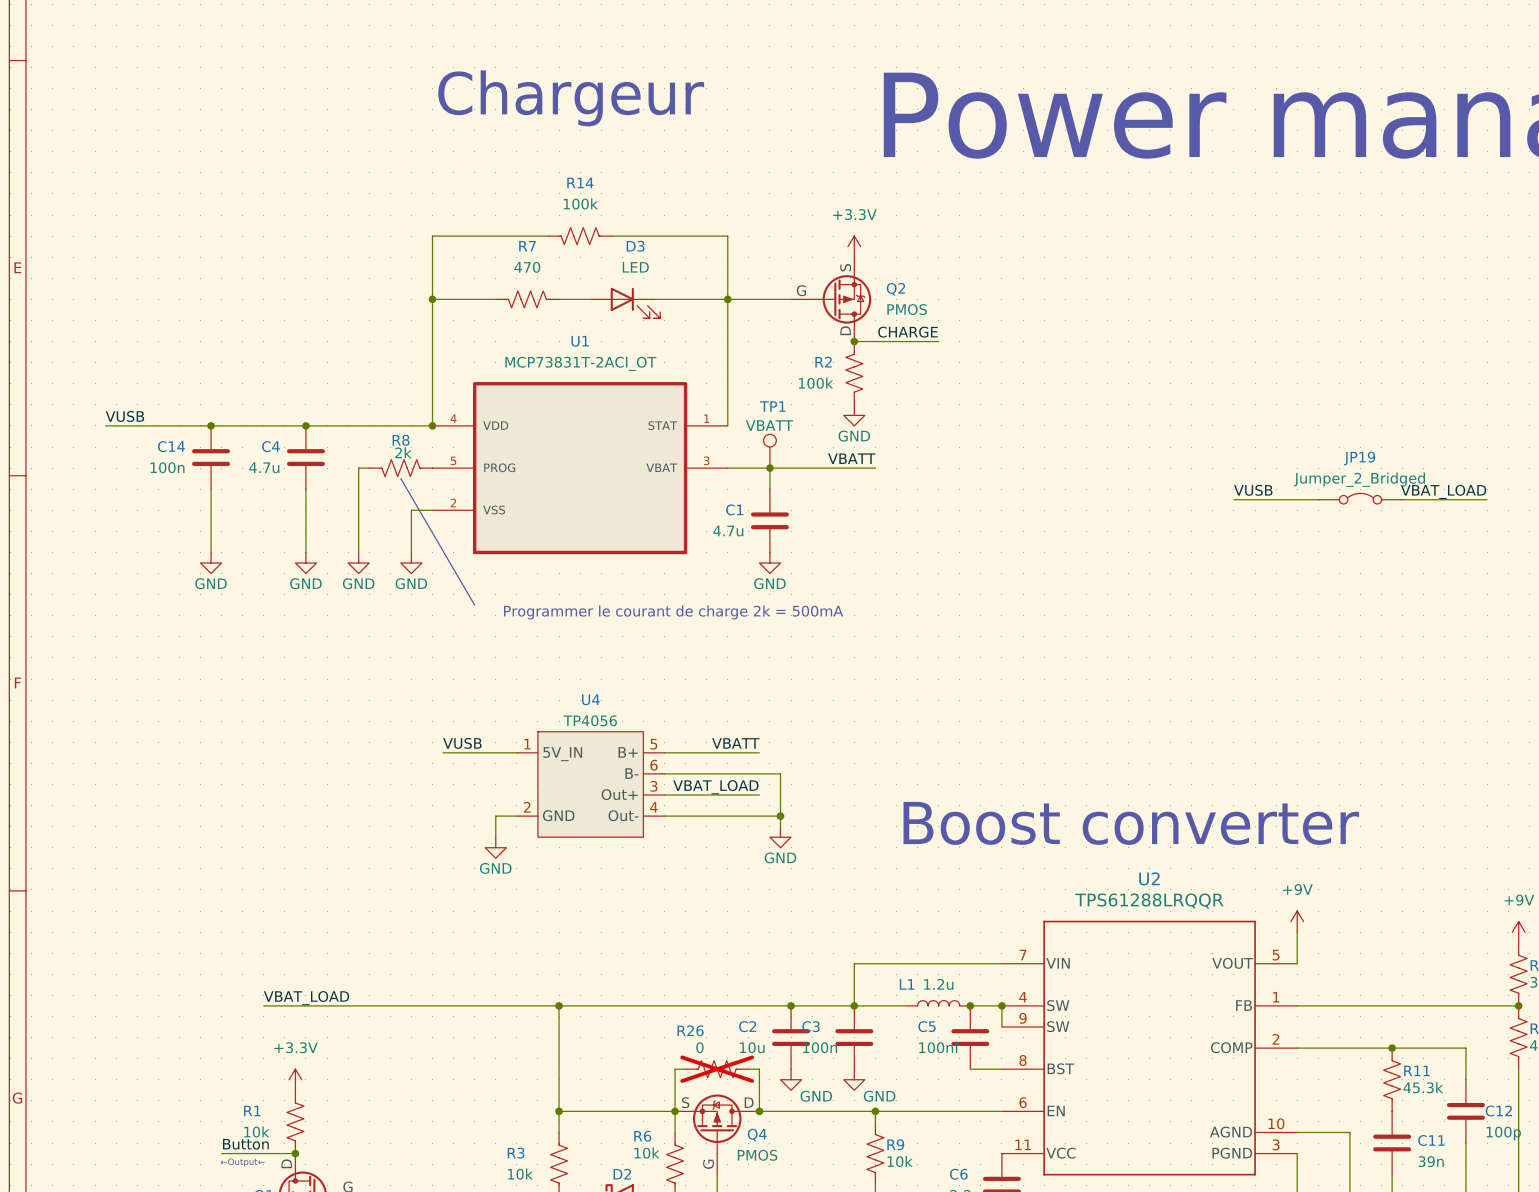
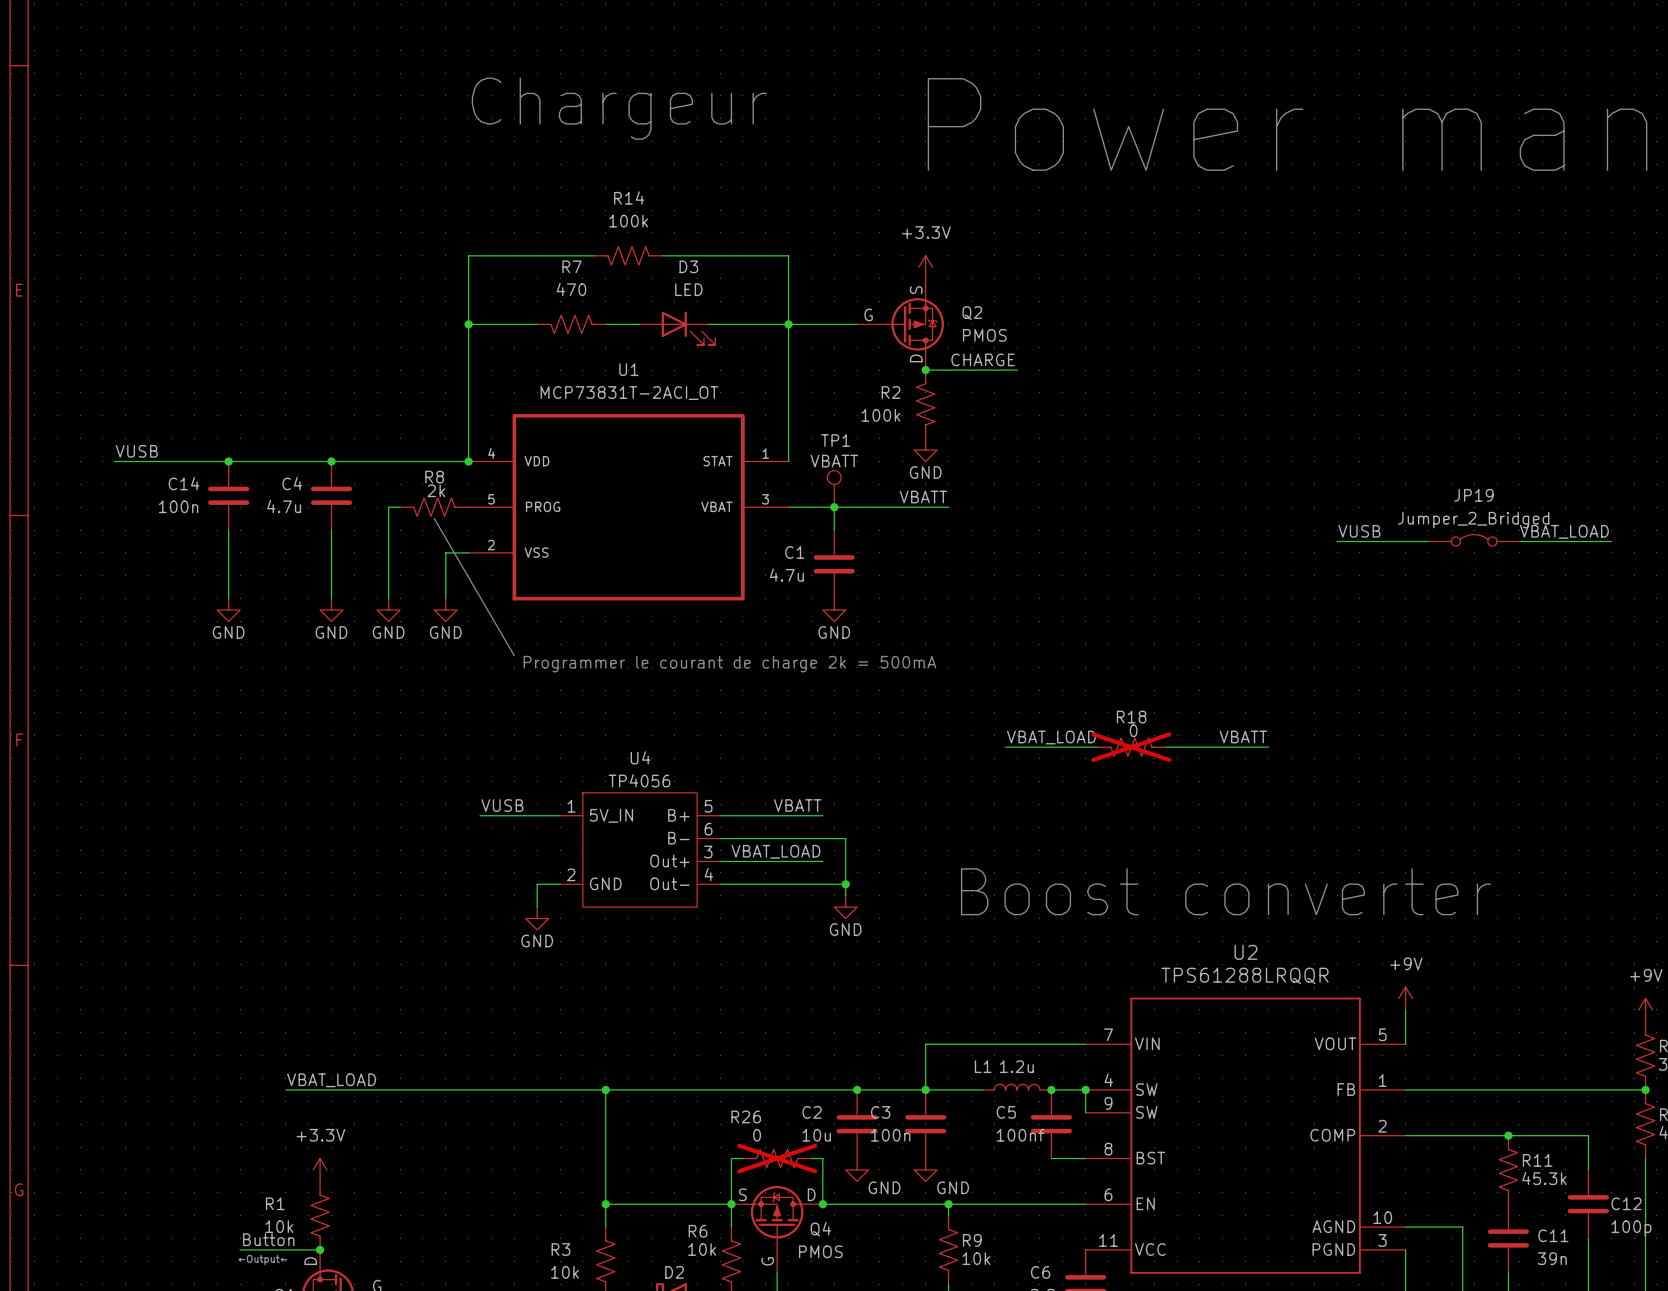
label: none -> VBATT (1243, 736)
label: none -> VBAT_LOAD (1051, 737)
wire: none -> (1005, 747) (1097, 747)
R18: none -> 0 (1131, 747)
wire: none -> (1165, 747) (1268, 747)

